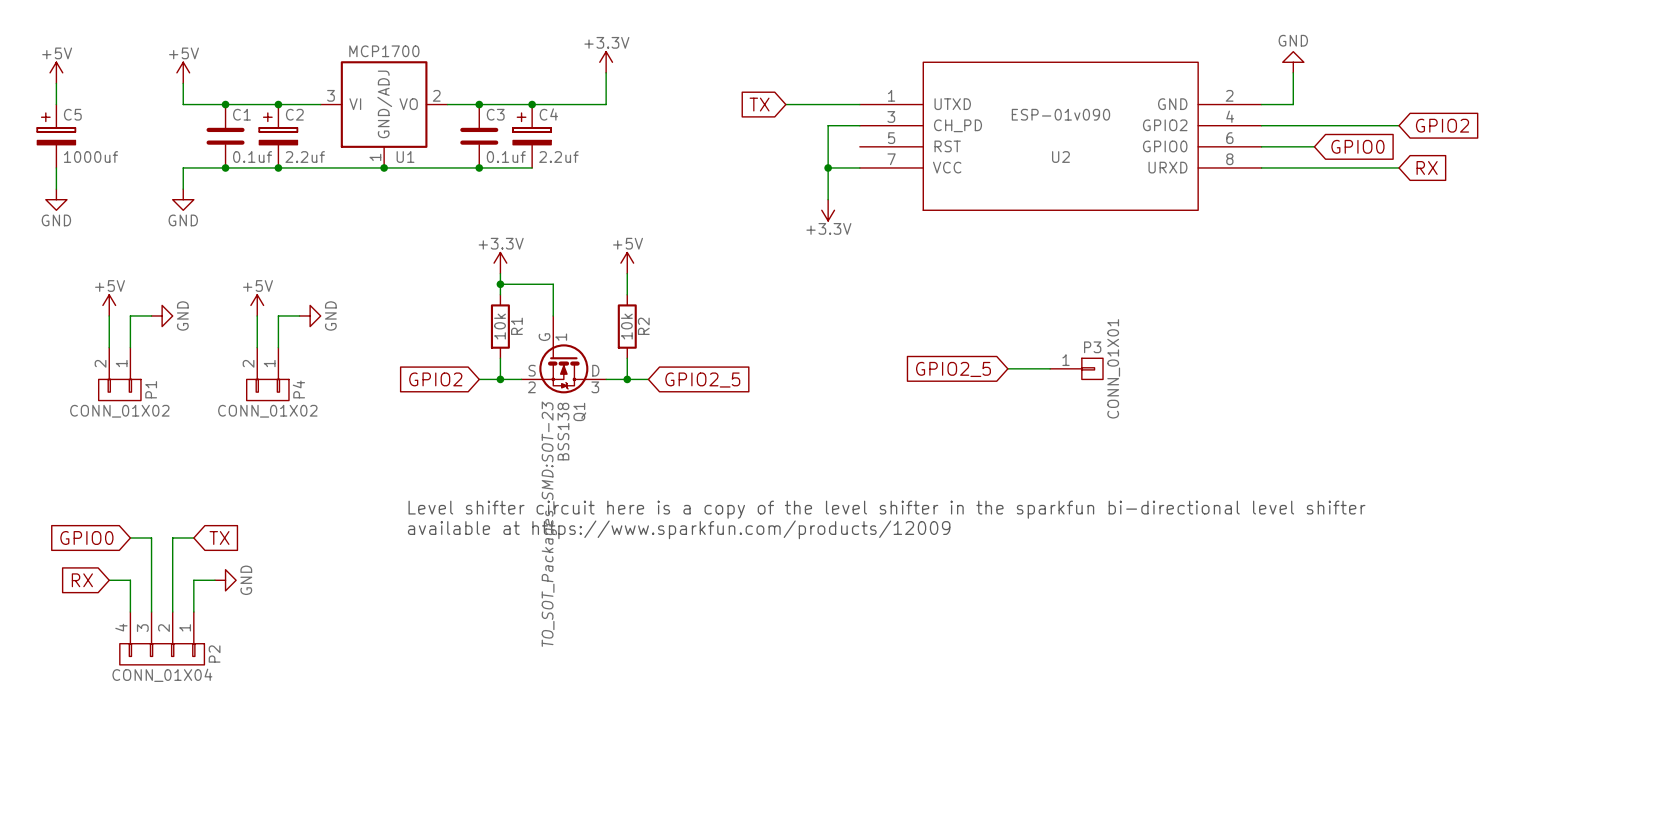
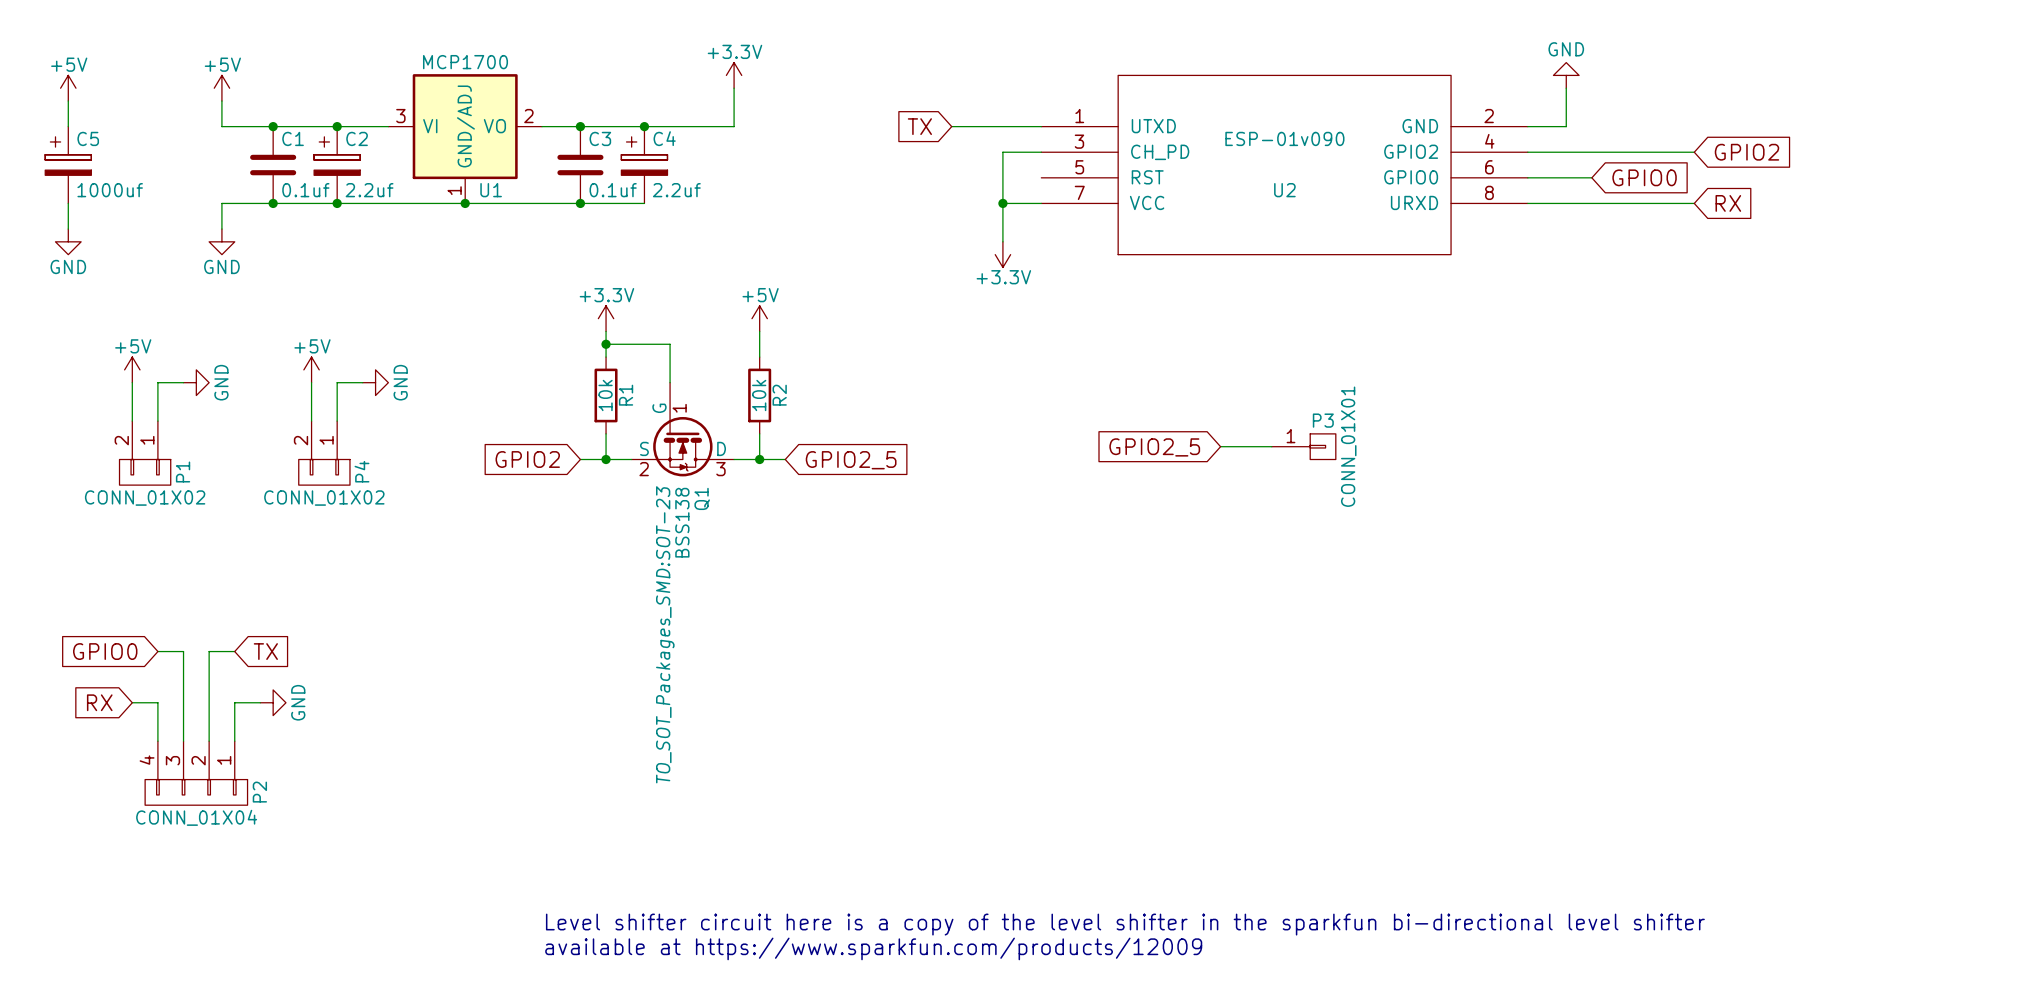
text: Level shifter circuit here is a copy of the level shifter in the sparkfun bi-directional level shifter (886, 509) -> none
text: available at https://www.sparkfun.com/products/12009 (679, 529) -> none
text: none -> Level shifter circuit here is a copy of the level shifter in the sparkfun bi-directional level shifter (1125, 924)
text: none -> available at https://www.sparkfun.com/products/12009 (873, 948)

